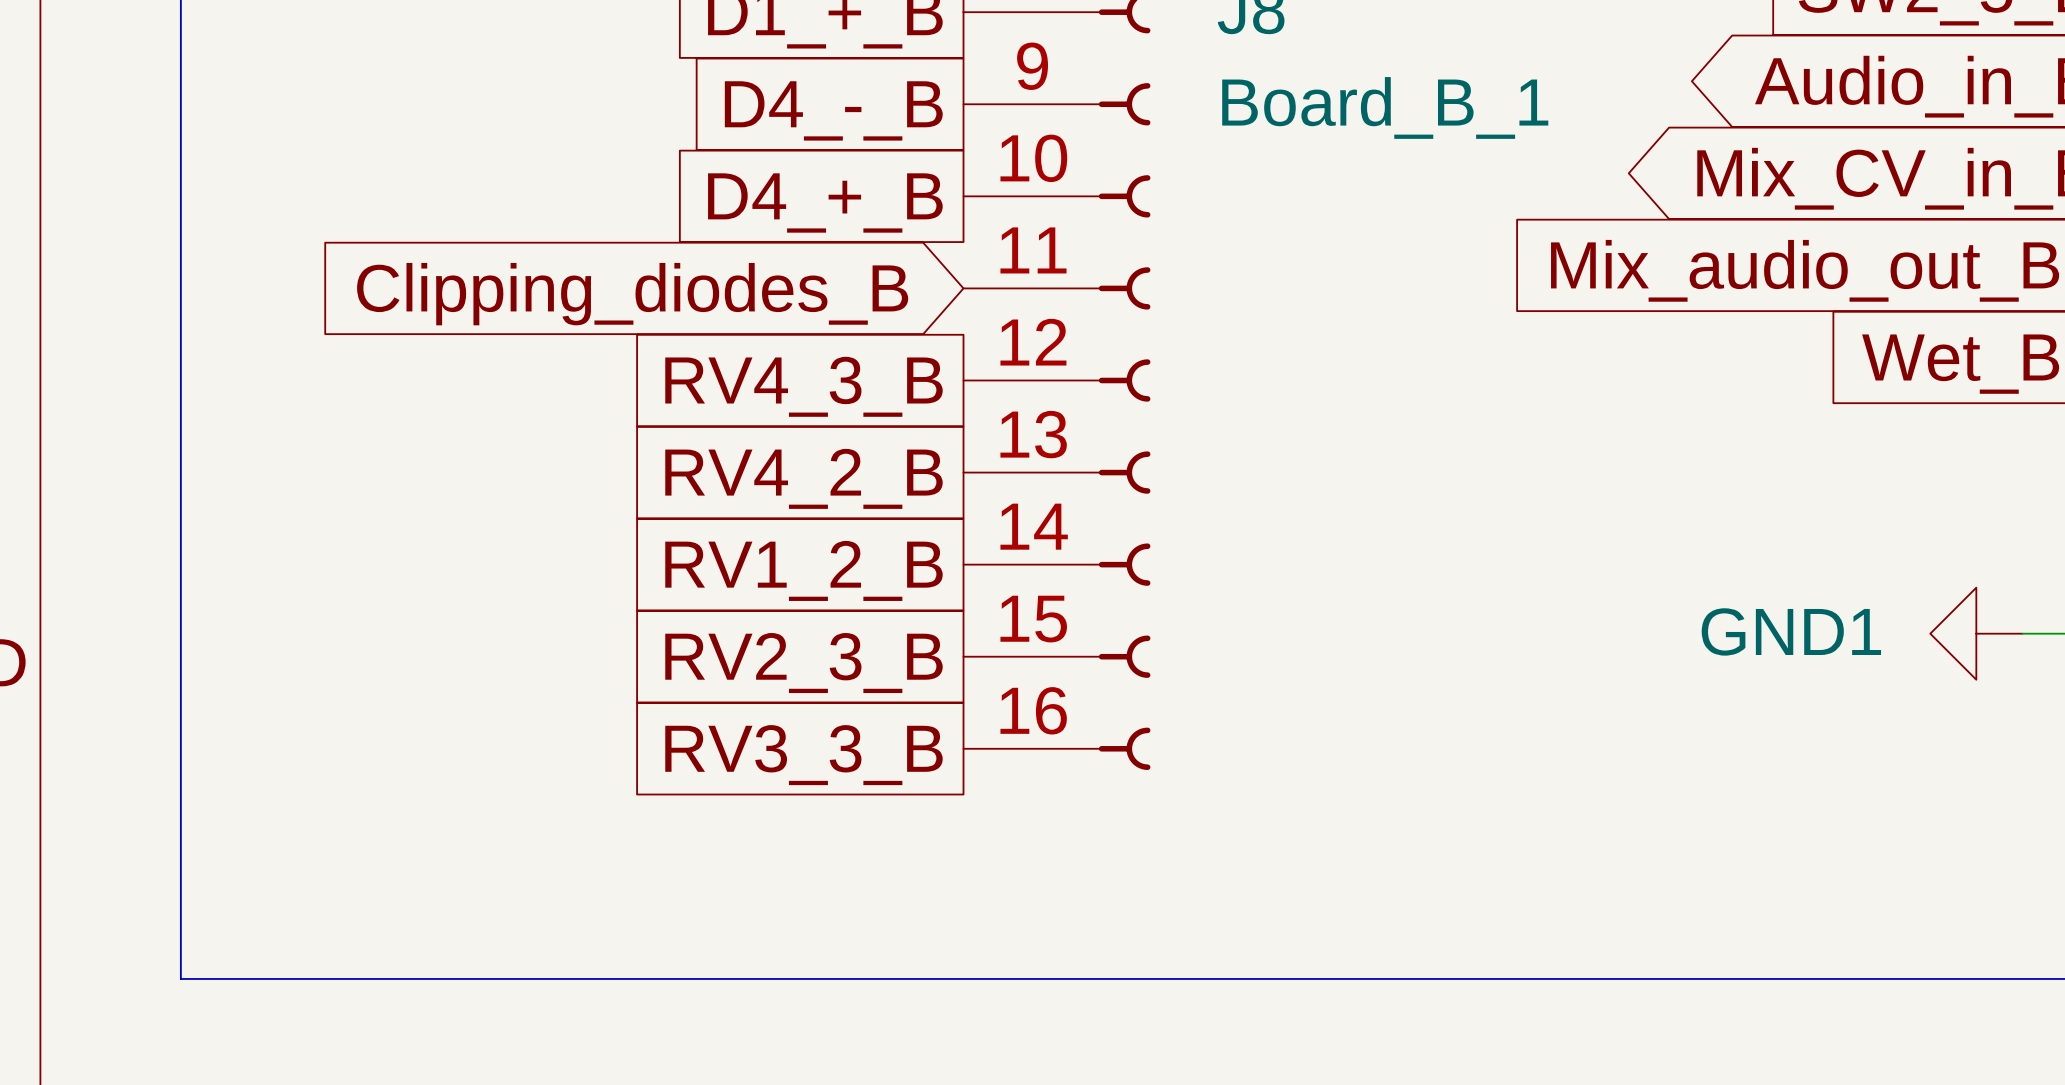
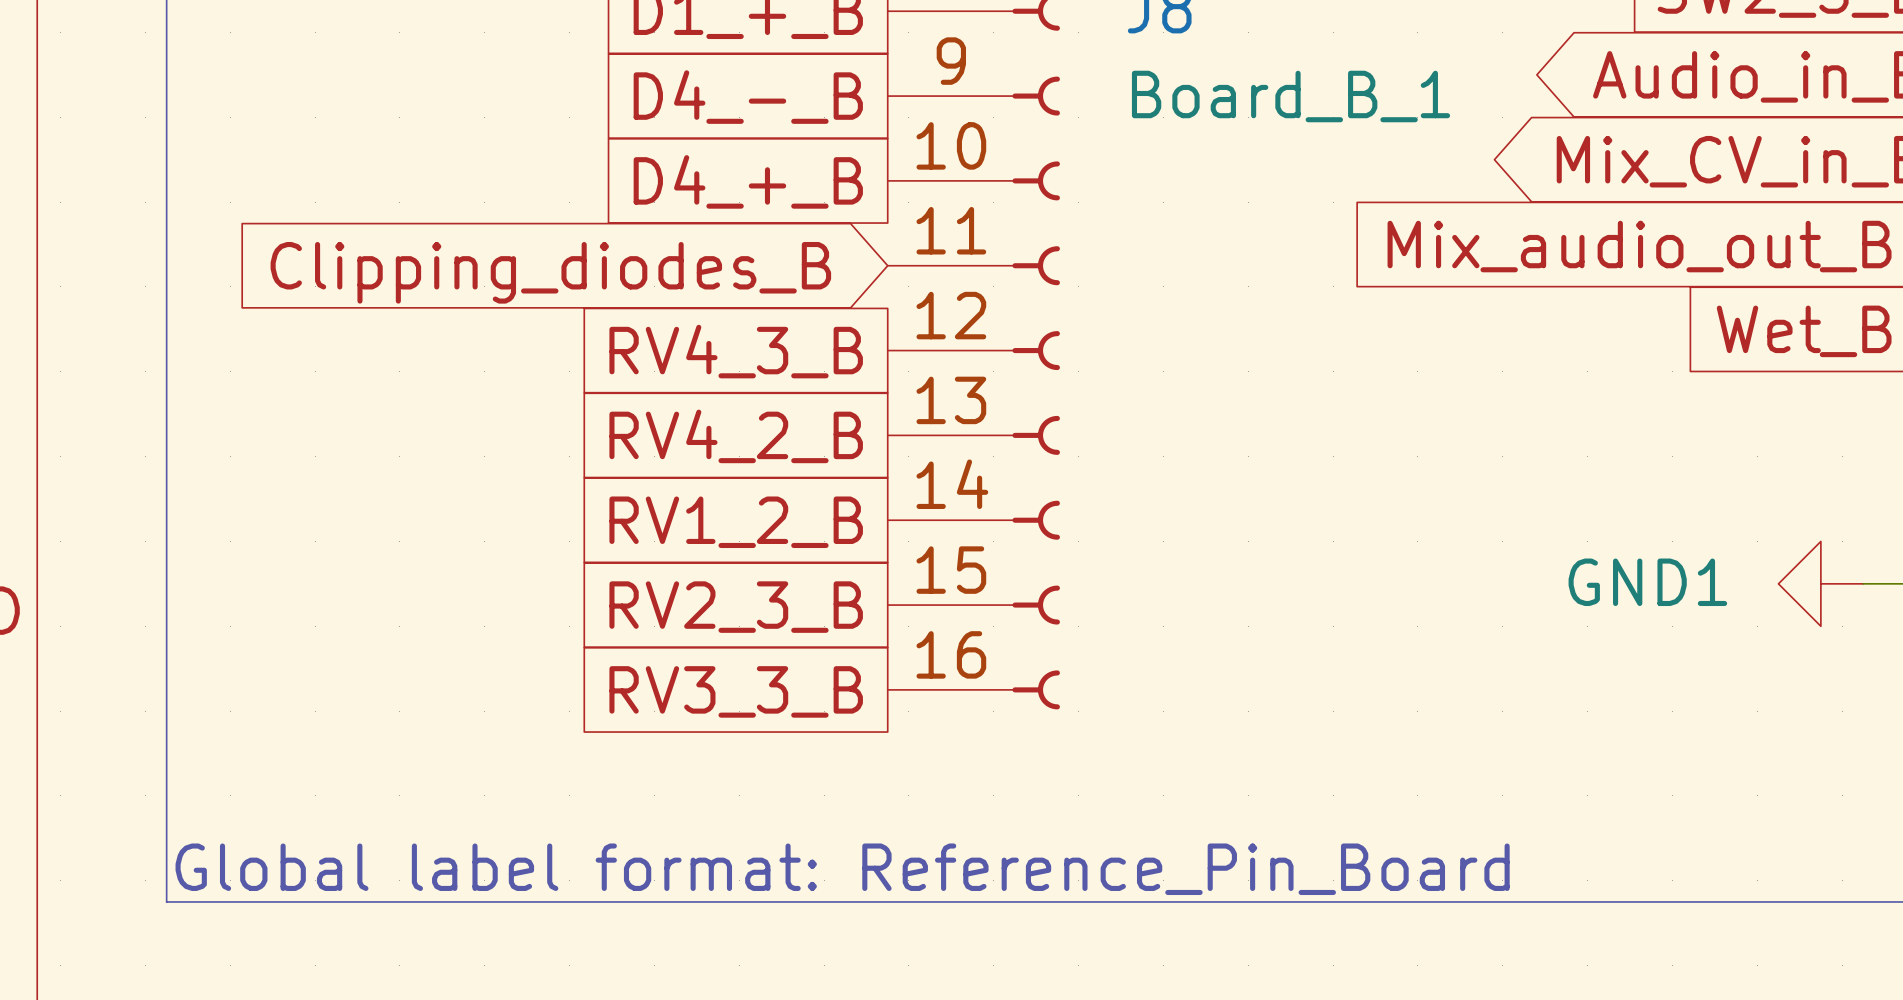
text: none -> Global label format: Reference_Pin_Board (842, 869)

